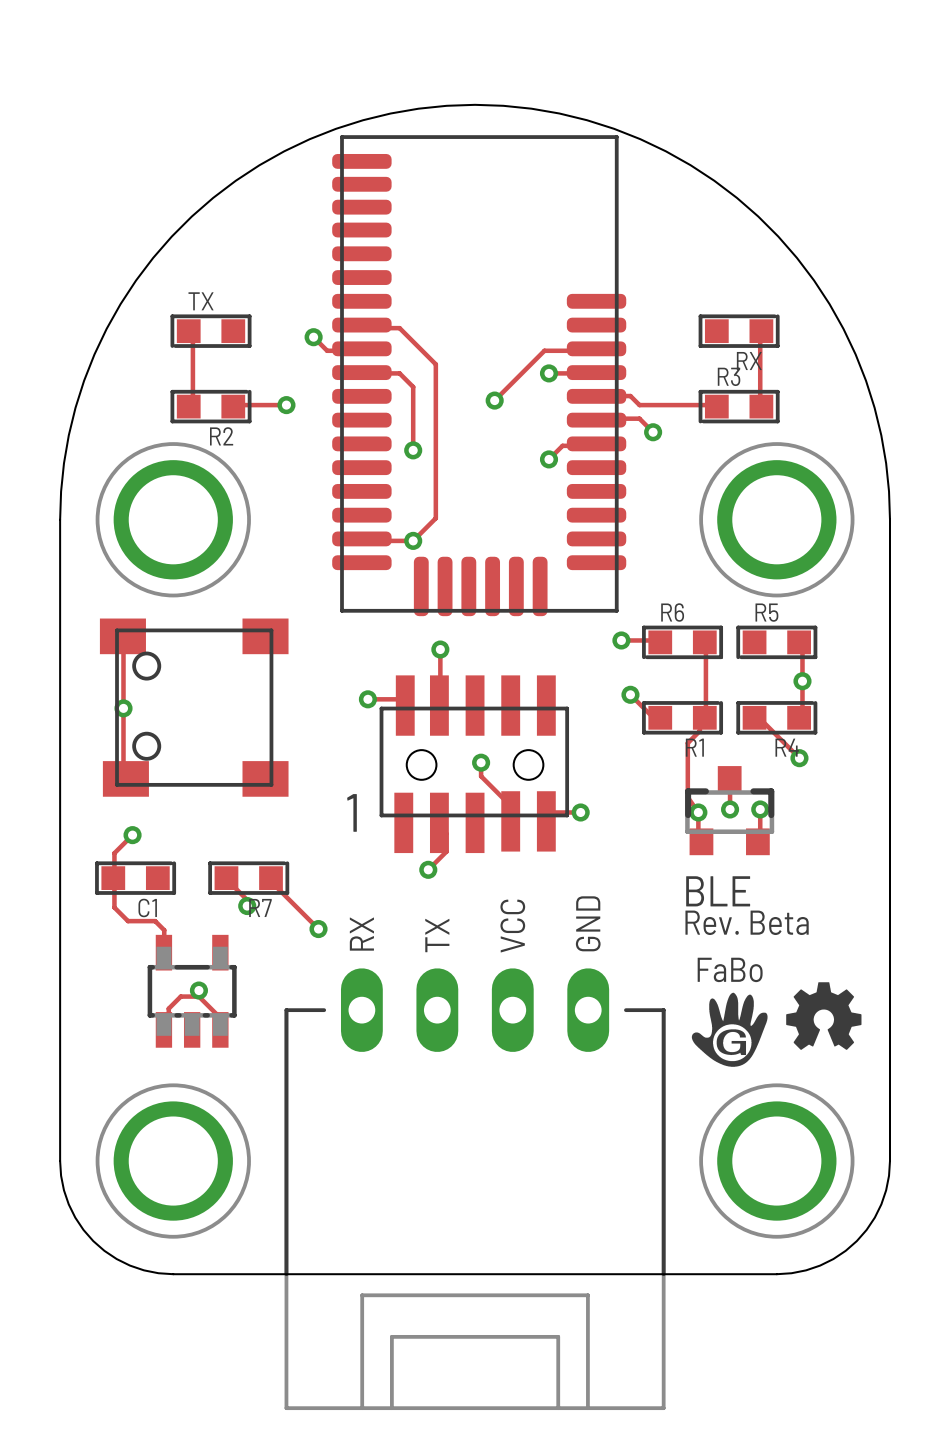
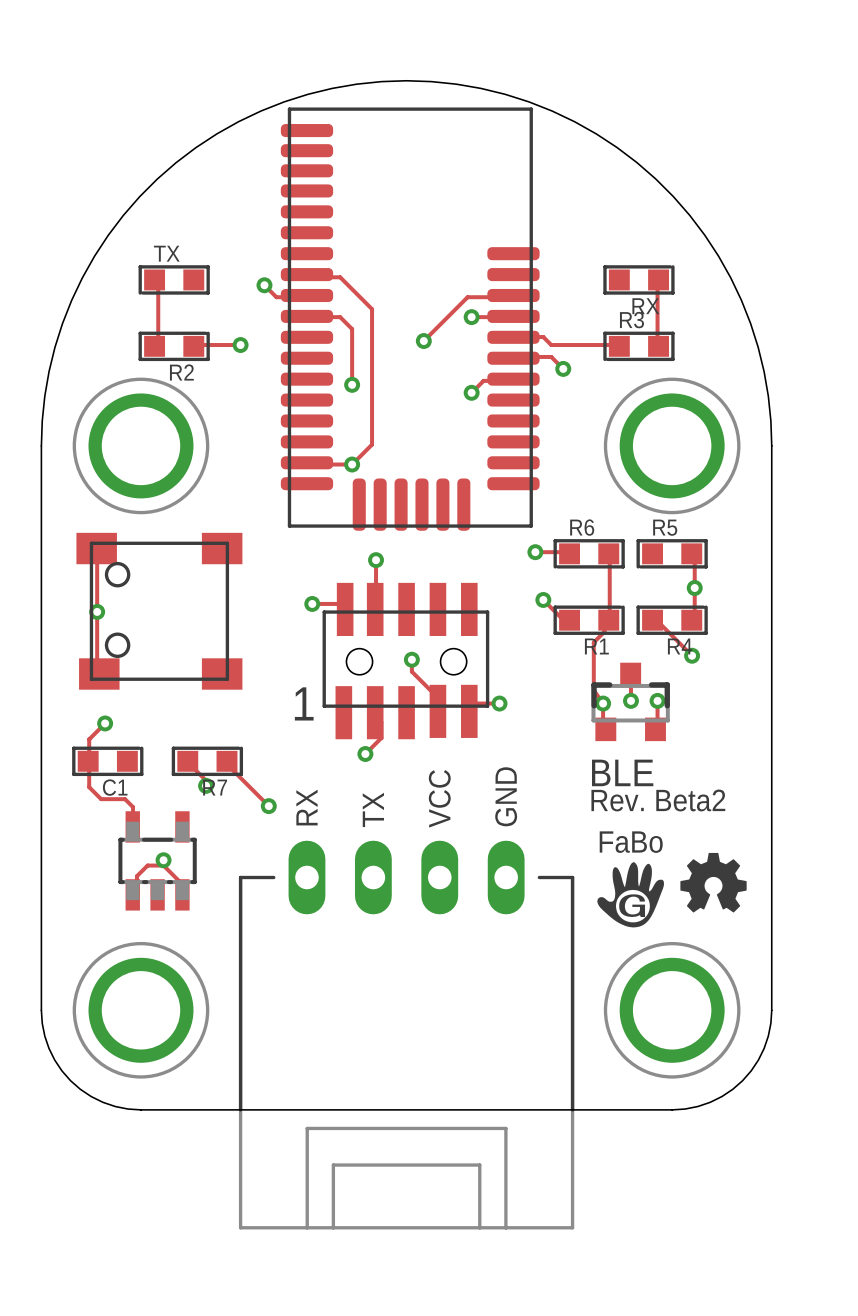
text: Rev. Beta (747, 922) -> Rev. Beta2 (658, 800)

